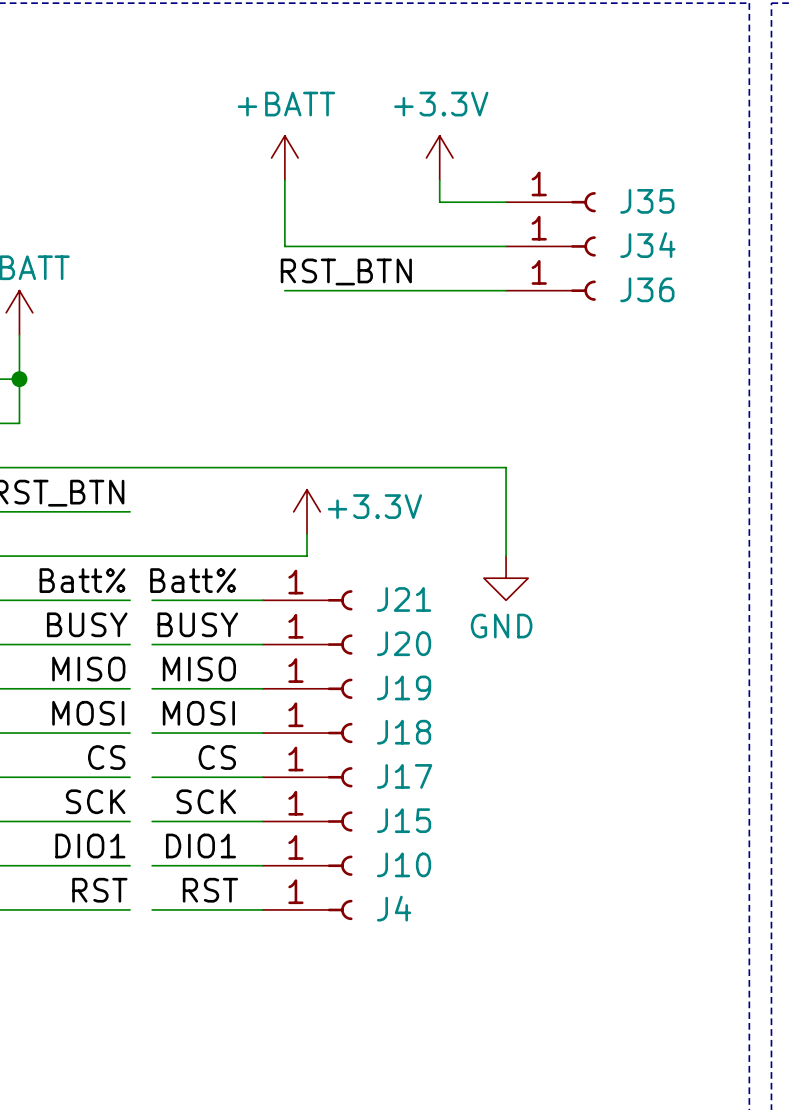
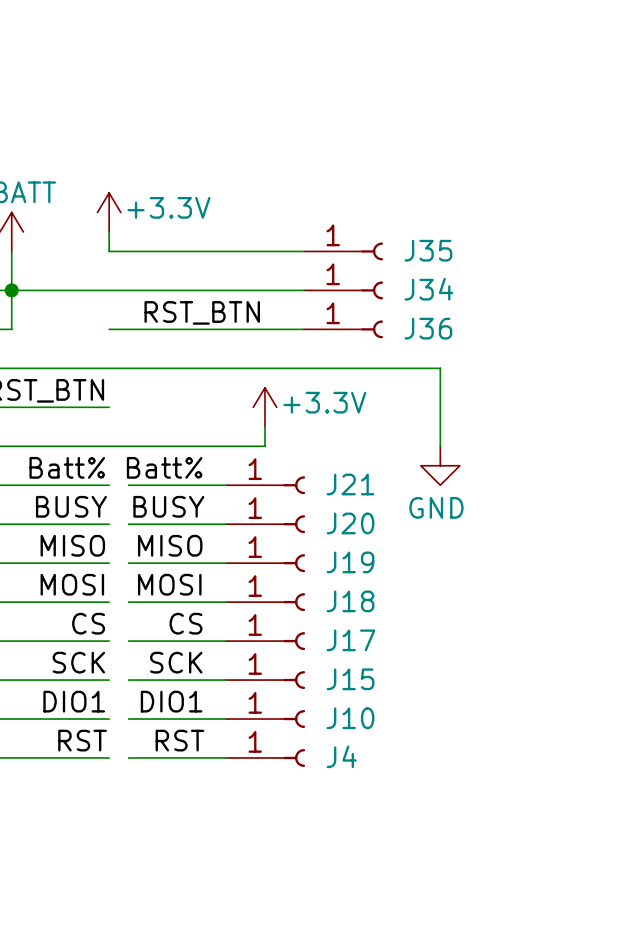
power symbol text position: +3.3V (441, 104) -> +3.3V (168, 207)
power symbol: +BATT (284, 157) -> none
power symbol position: +3.3V (439, 157) -> +3.3V (109, 212)
wire: (284, 180) (284, 246) (506, 246) -> none
wire: (439, 180) (439, 202) (506, 202) -> none
J35 position: (550, 202) -> (343, 251)
J34 position: (550, 246) -> (343, 290)
label position: RST_BTN (346, 271) -> RST_BTN (202, 312)
wire: (284, 290) (506, 290) -> (109, 329) (303, 329)
J36 position: (550, 290) -> (343, 329)
wire: none -> (109, 231) (109, 251) (303, 251)
wire: none -> (11, 290) (303, 290)

